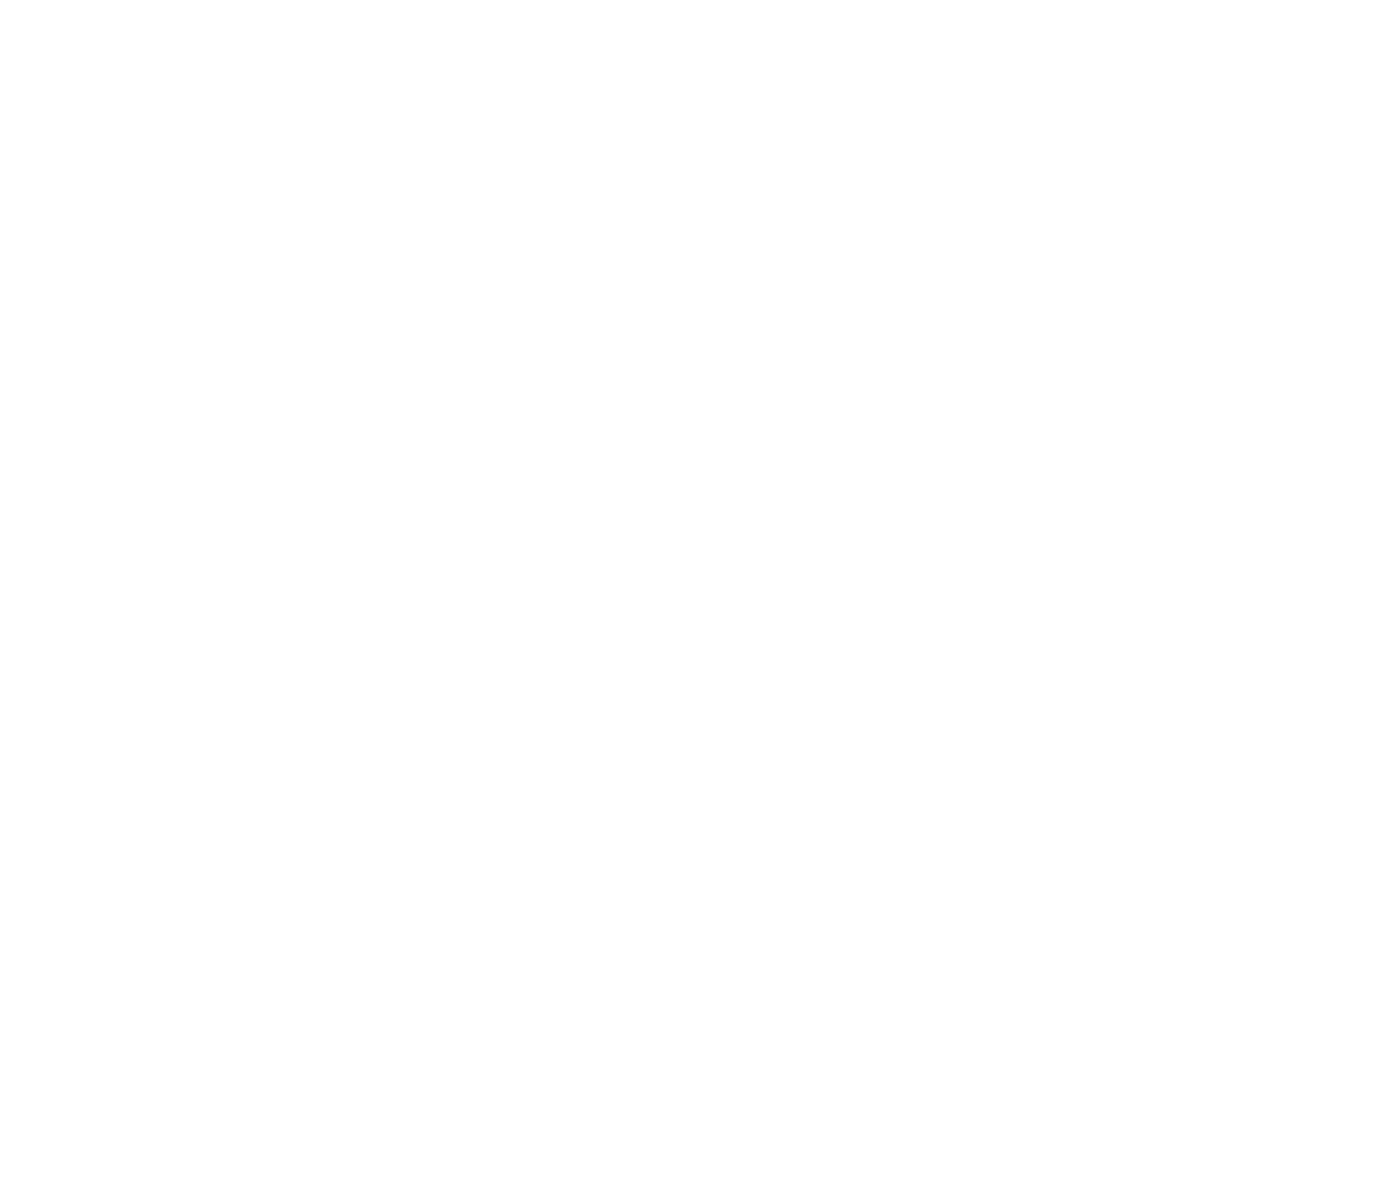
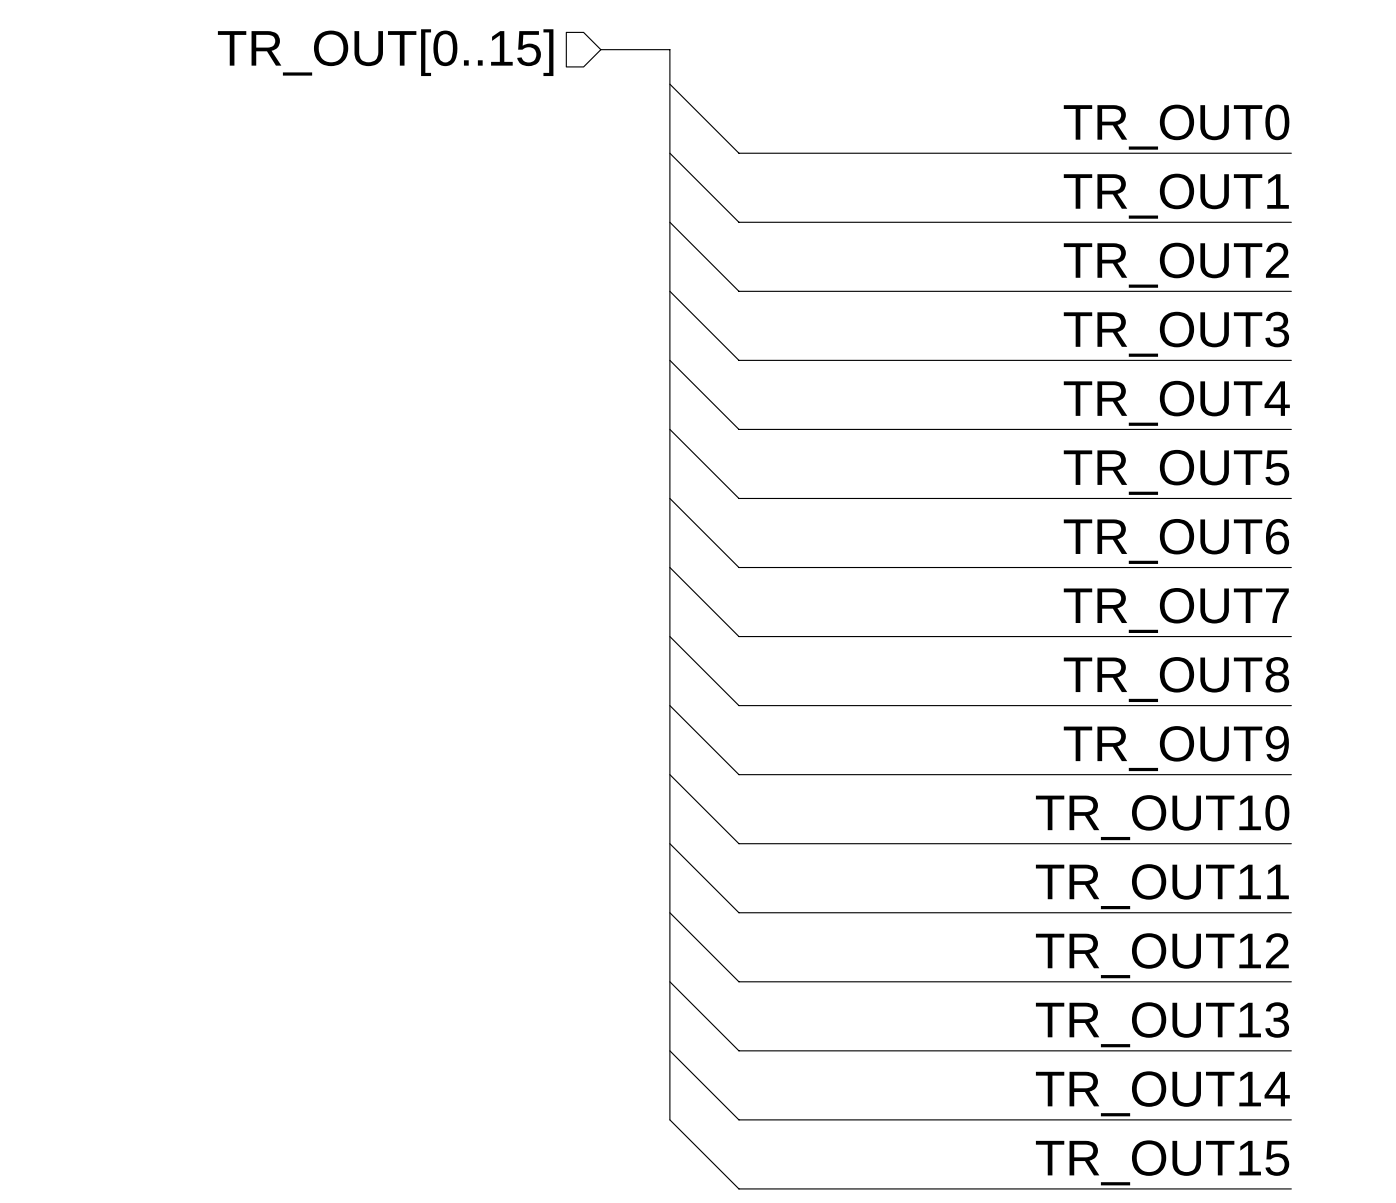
bus: none -> (600, 49) (669, 49) (669, 1119)
hierarchical label: none -> TR_OUT[0..15] (385, 52)
wire: none -> (669, 84) (738, 153) (1291, 153)
label: none -> TR_OUT0 (1176, 127)
wire: none -> (669, 153) (738, 222) (1291, 222)
label: none -> TR_OUT1 (1176, 196)
wire: none -> (669, 222) (738, 291) (1291, 291)
label: none -> TR_OUT2 (1176, 265)
wire: none -> (669, 291) (738, 360) (1291, 360)
label: none -> TR_OUT3 (1176, 334)
wire: none -> (669, 360) (738, 429) (1291, 429)
label: none -> TR_OUT4 (1176, 403)
wire: none -> (669, 429) (738, 498) (1291, 498)
label: none -> TR_OUT5 (1176, 472)
wire: none -> (669, 498) (738, 567) (1291, 567)
label: none -> TR_OUT6 (1176, 541)
wire: none -> (669, 567) (738, 636) (1291, 636)
label: none -> TR_OUT7 (1176, 610)
wire: none -> (669, 636) (738, 705) (1291, 705)
label: none -> TR_OUT8 (1176, 679)
wire: none -> (669, 705) (738, 774) (1291, 774)
label: none -> TR_OUT9 (1176, 748)
wire: none -> (669, 774) (738, 843) (1291, 843)
label: none -> TR_OUT10 (1162, 817)
wire: none -> (669, 843) (738, 912) (1291, 912)
label: none -> TR_OUT11 (1162, 886)
wire: none -> (669, 912) (738, 981) (1291, 981)
label: none -> TR_OUT12 (1162, 955)
wire: none -> (669, 981) (738, 1050) (1291, 1050)
label: none -> TR_OUT13 (1162, 1024)
wire: none -> (669, 1050) (738, 1119) (1291, 1119)
label: none -> TR_OUT14 (1162, 1093)
wire: none -> (669, 1119) (738, 1188) (1291, 1188)
label: none -> TR_OUT15 (1162, 1162)

